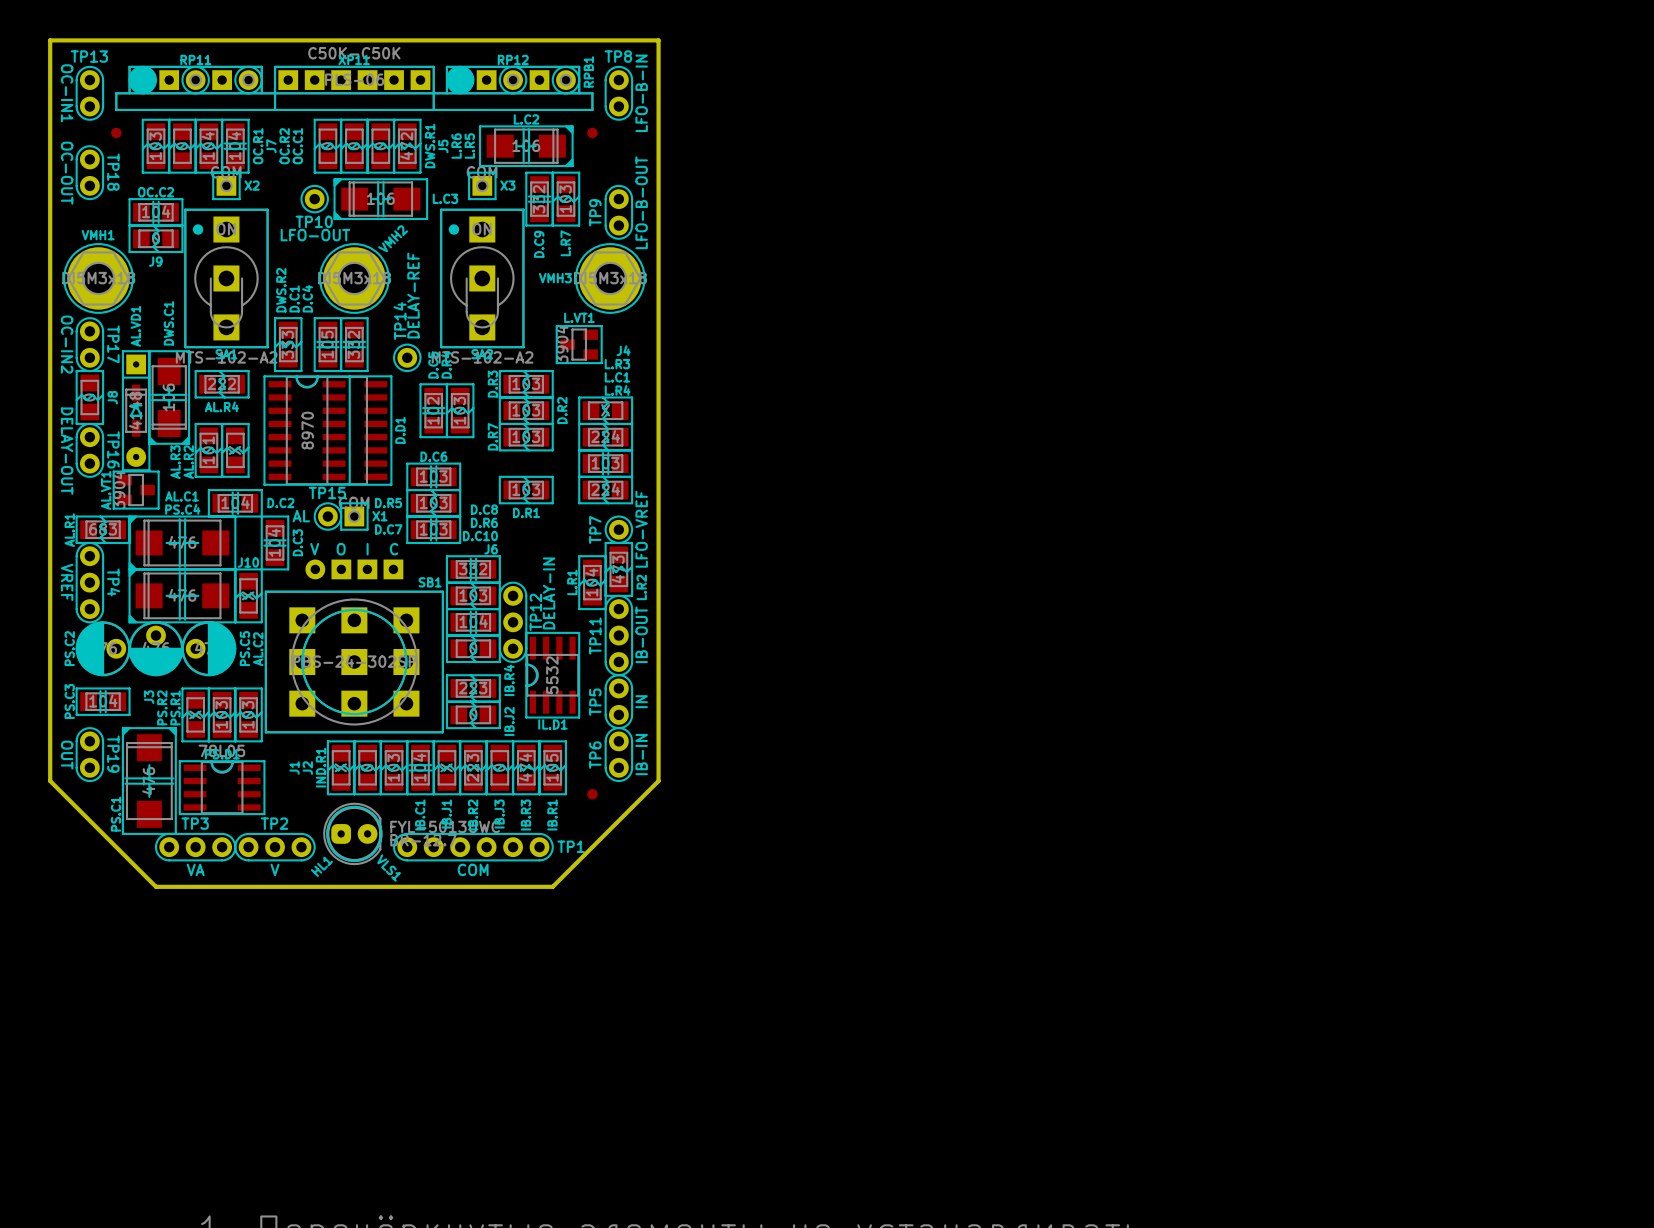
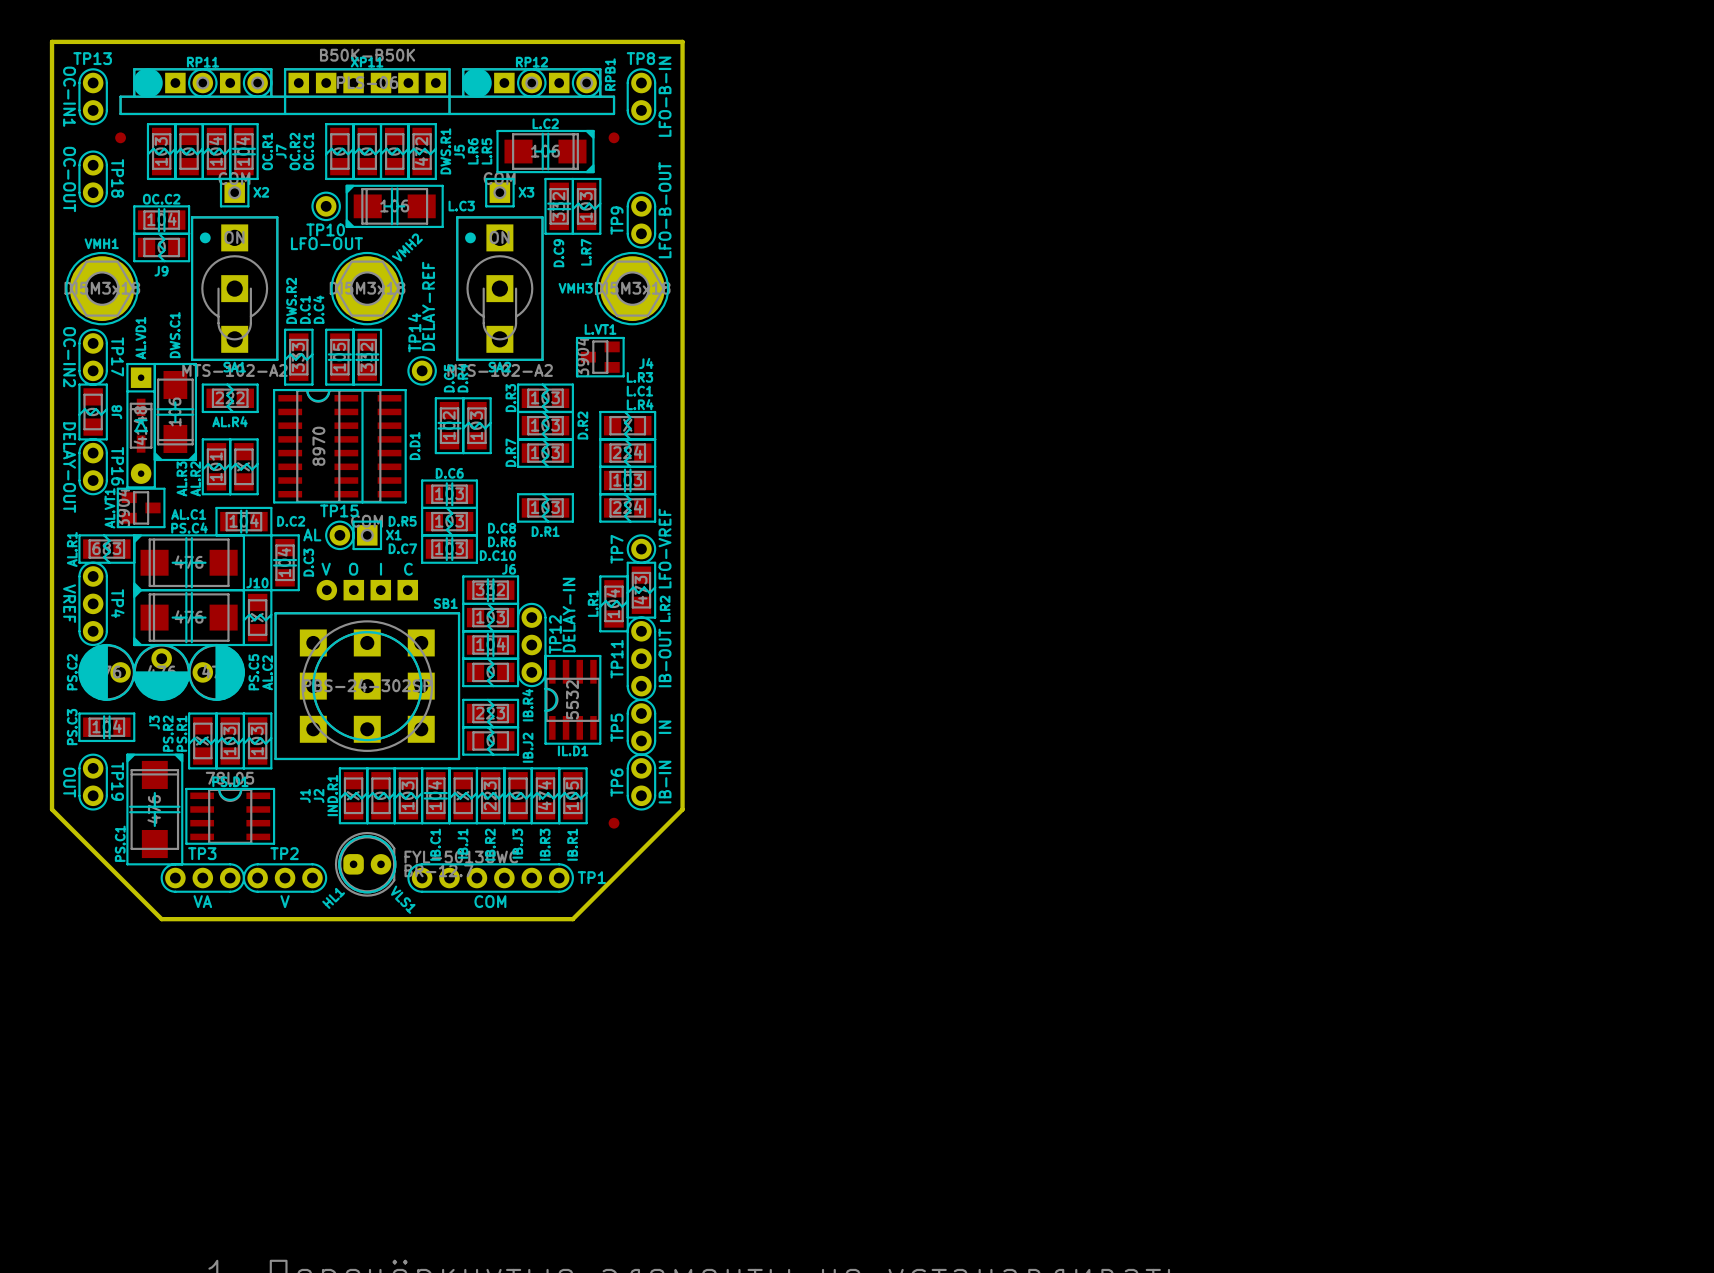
RPB1 value: C50K-C50K (354, 53) -> B50K-B50K (367, 55)

